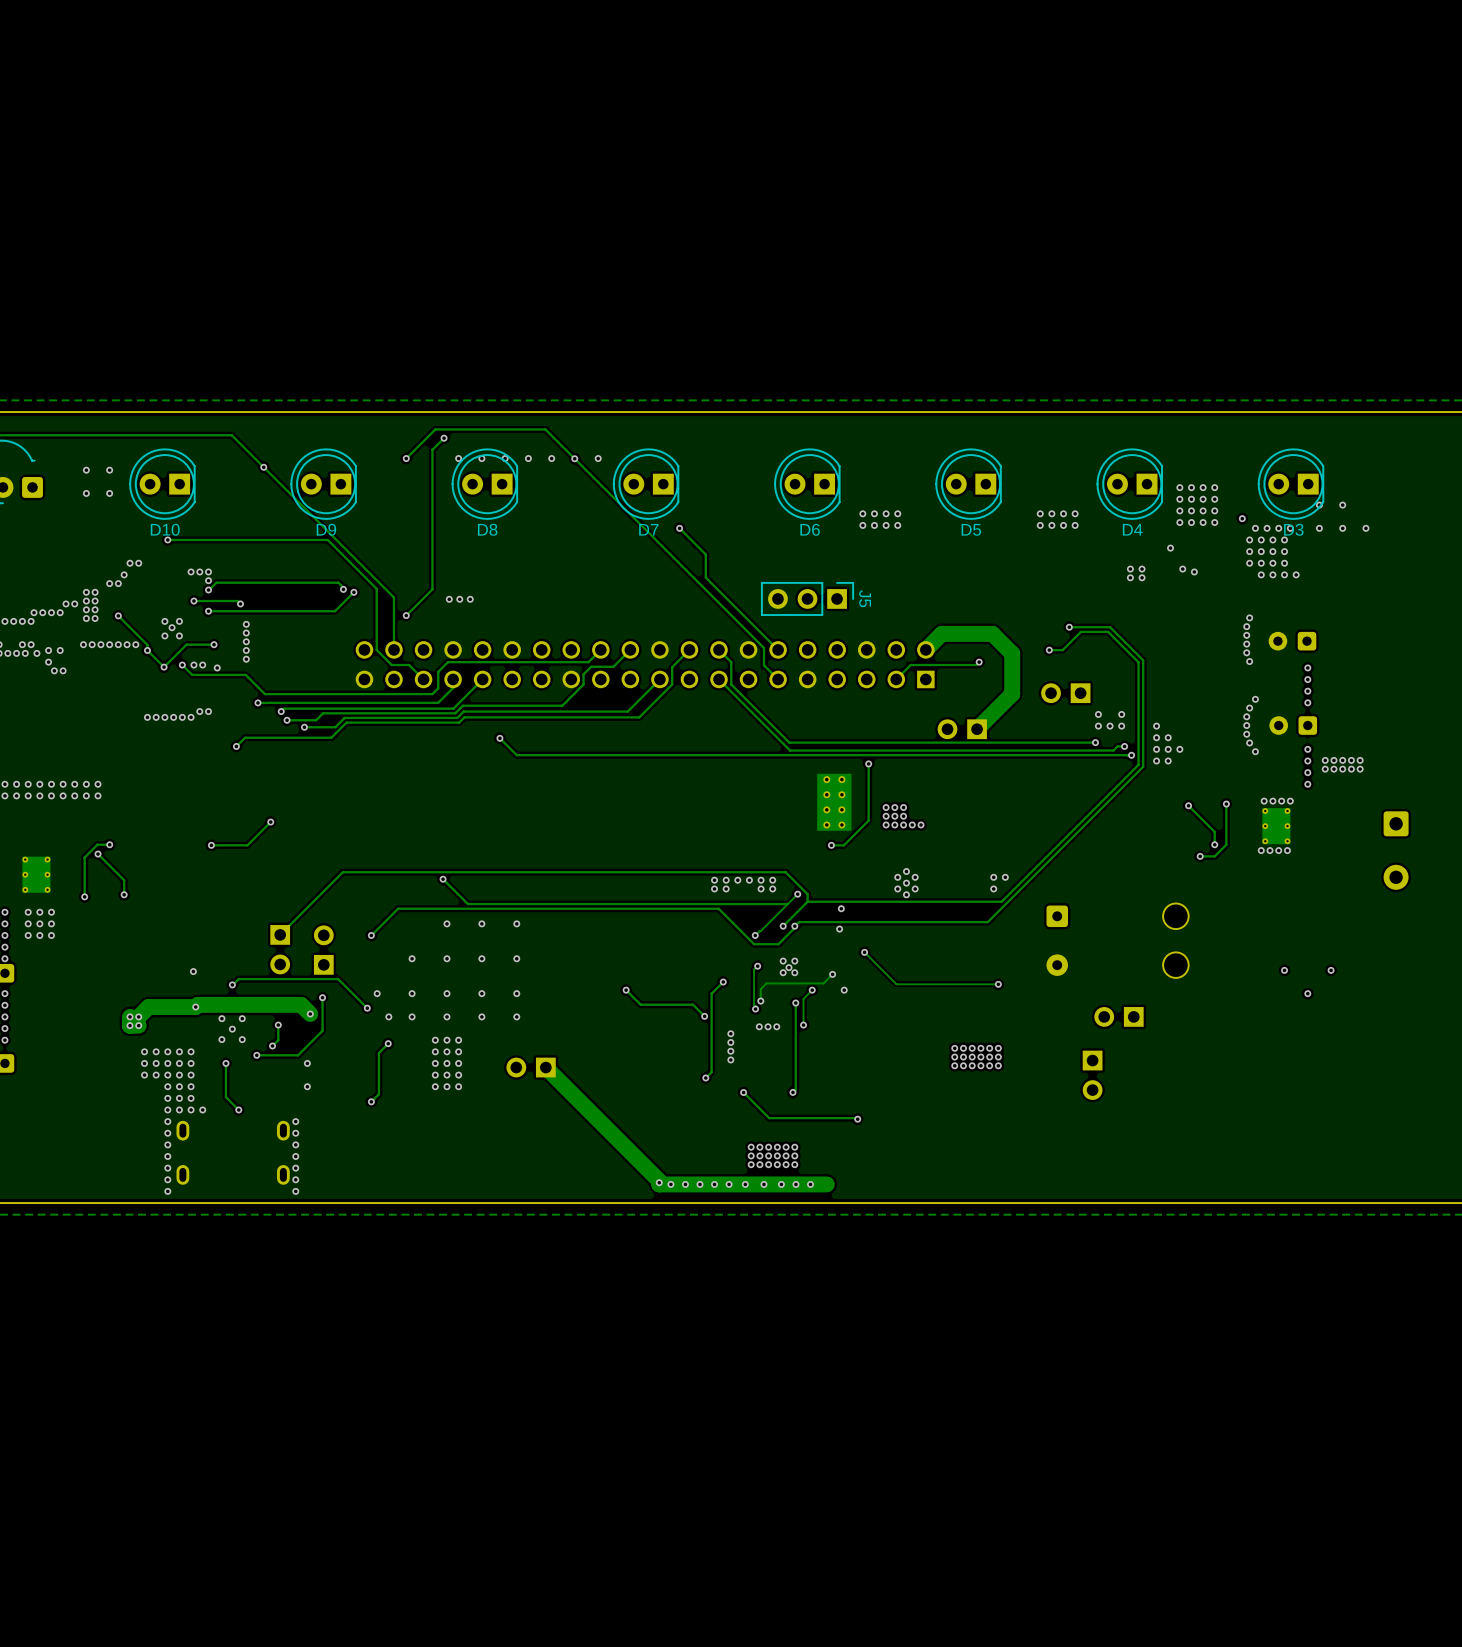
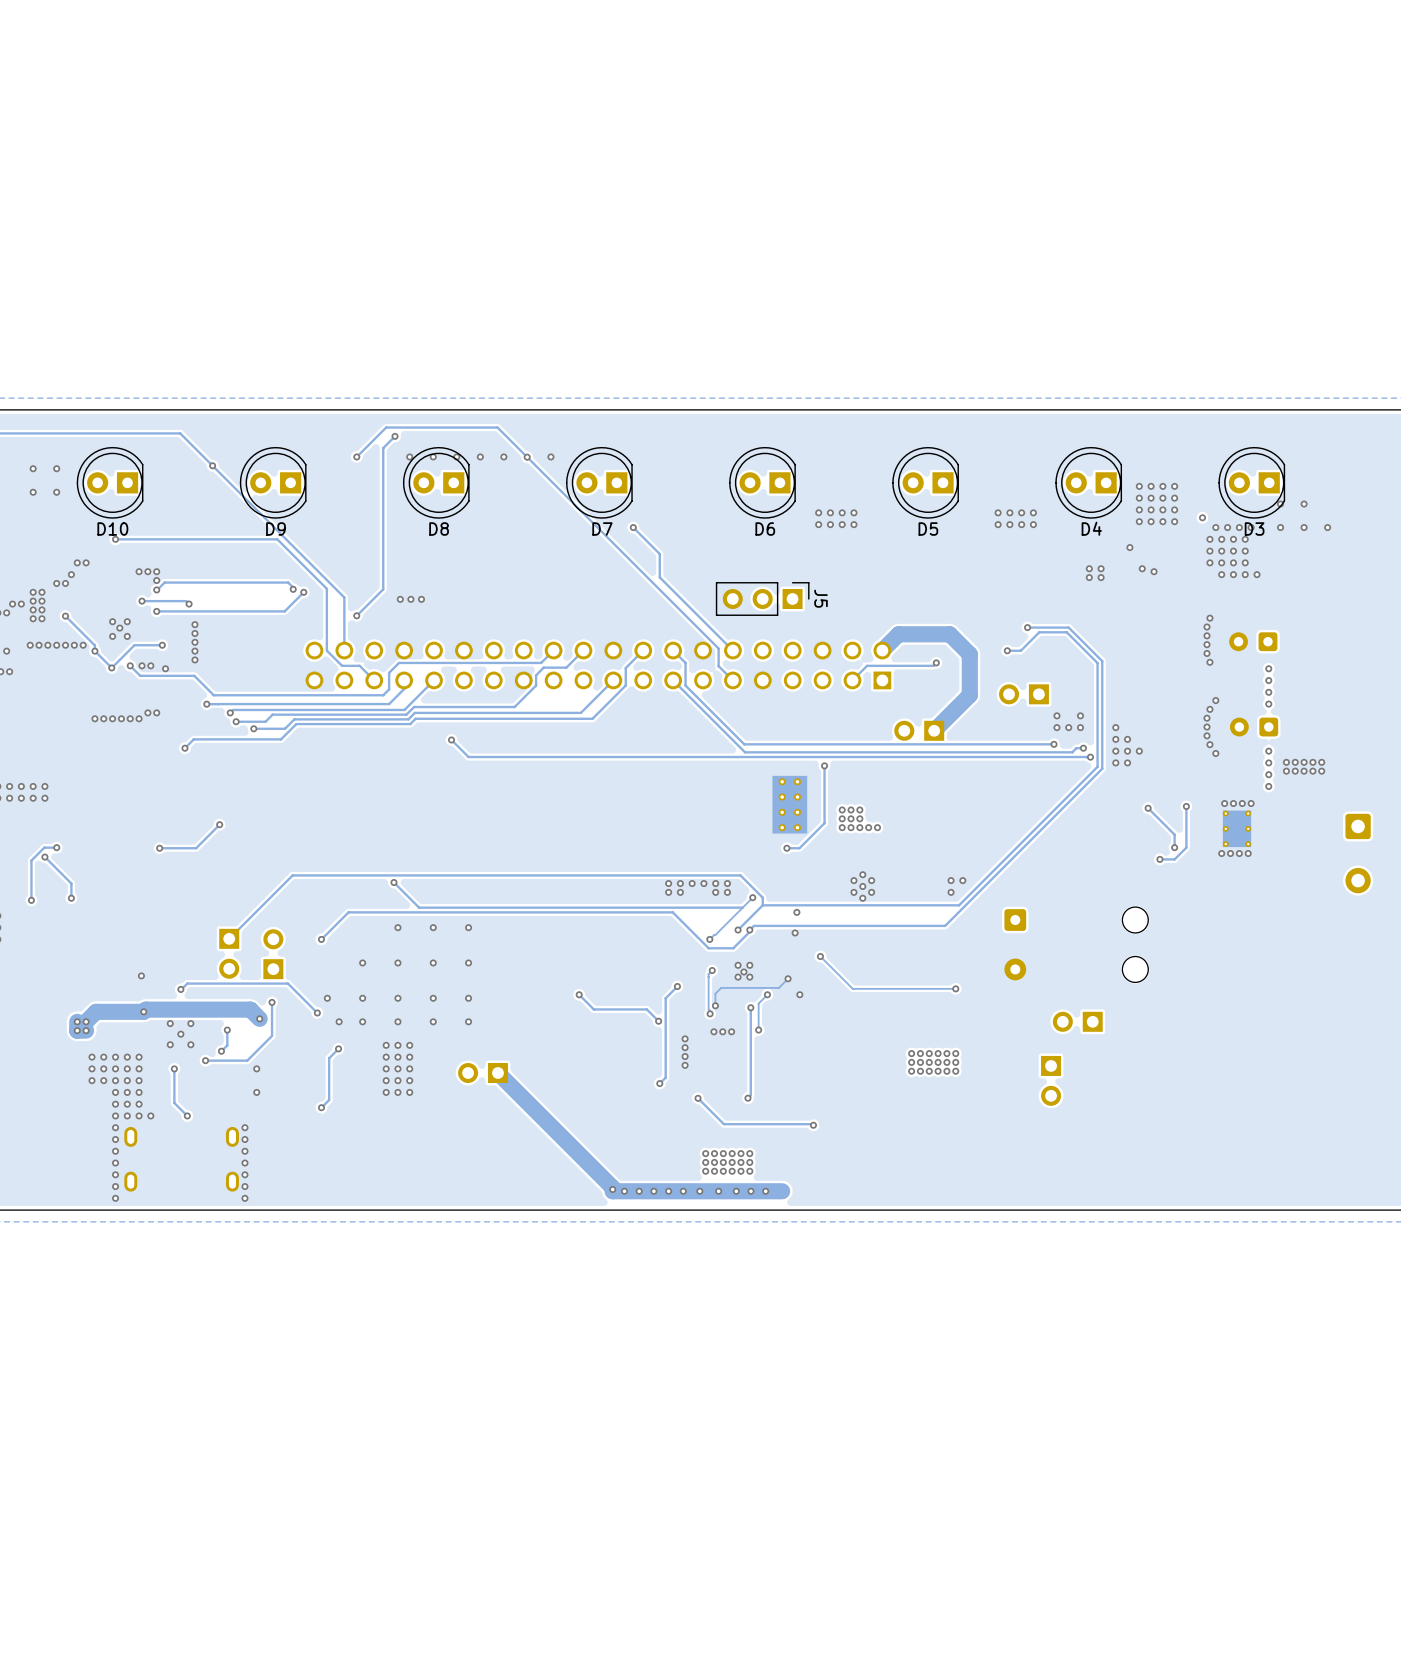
via: (1284, 970) -> none
via: (1331, 970) -> none
via: (1307, 993) -> none

